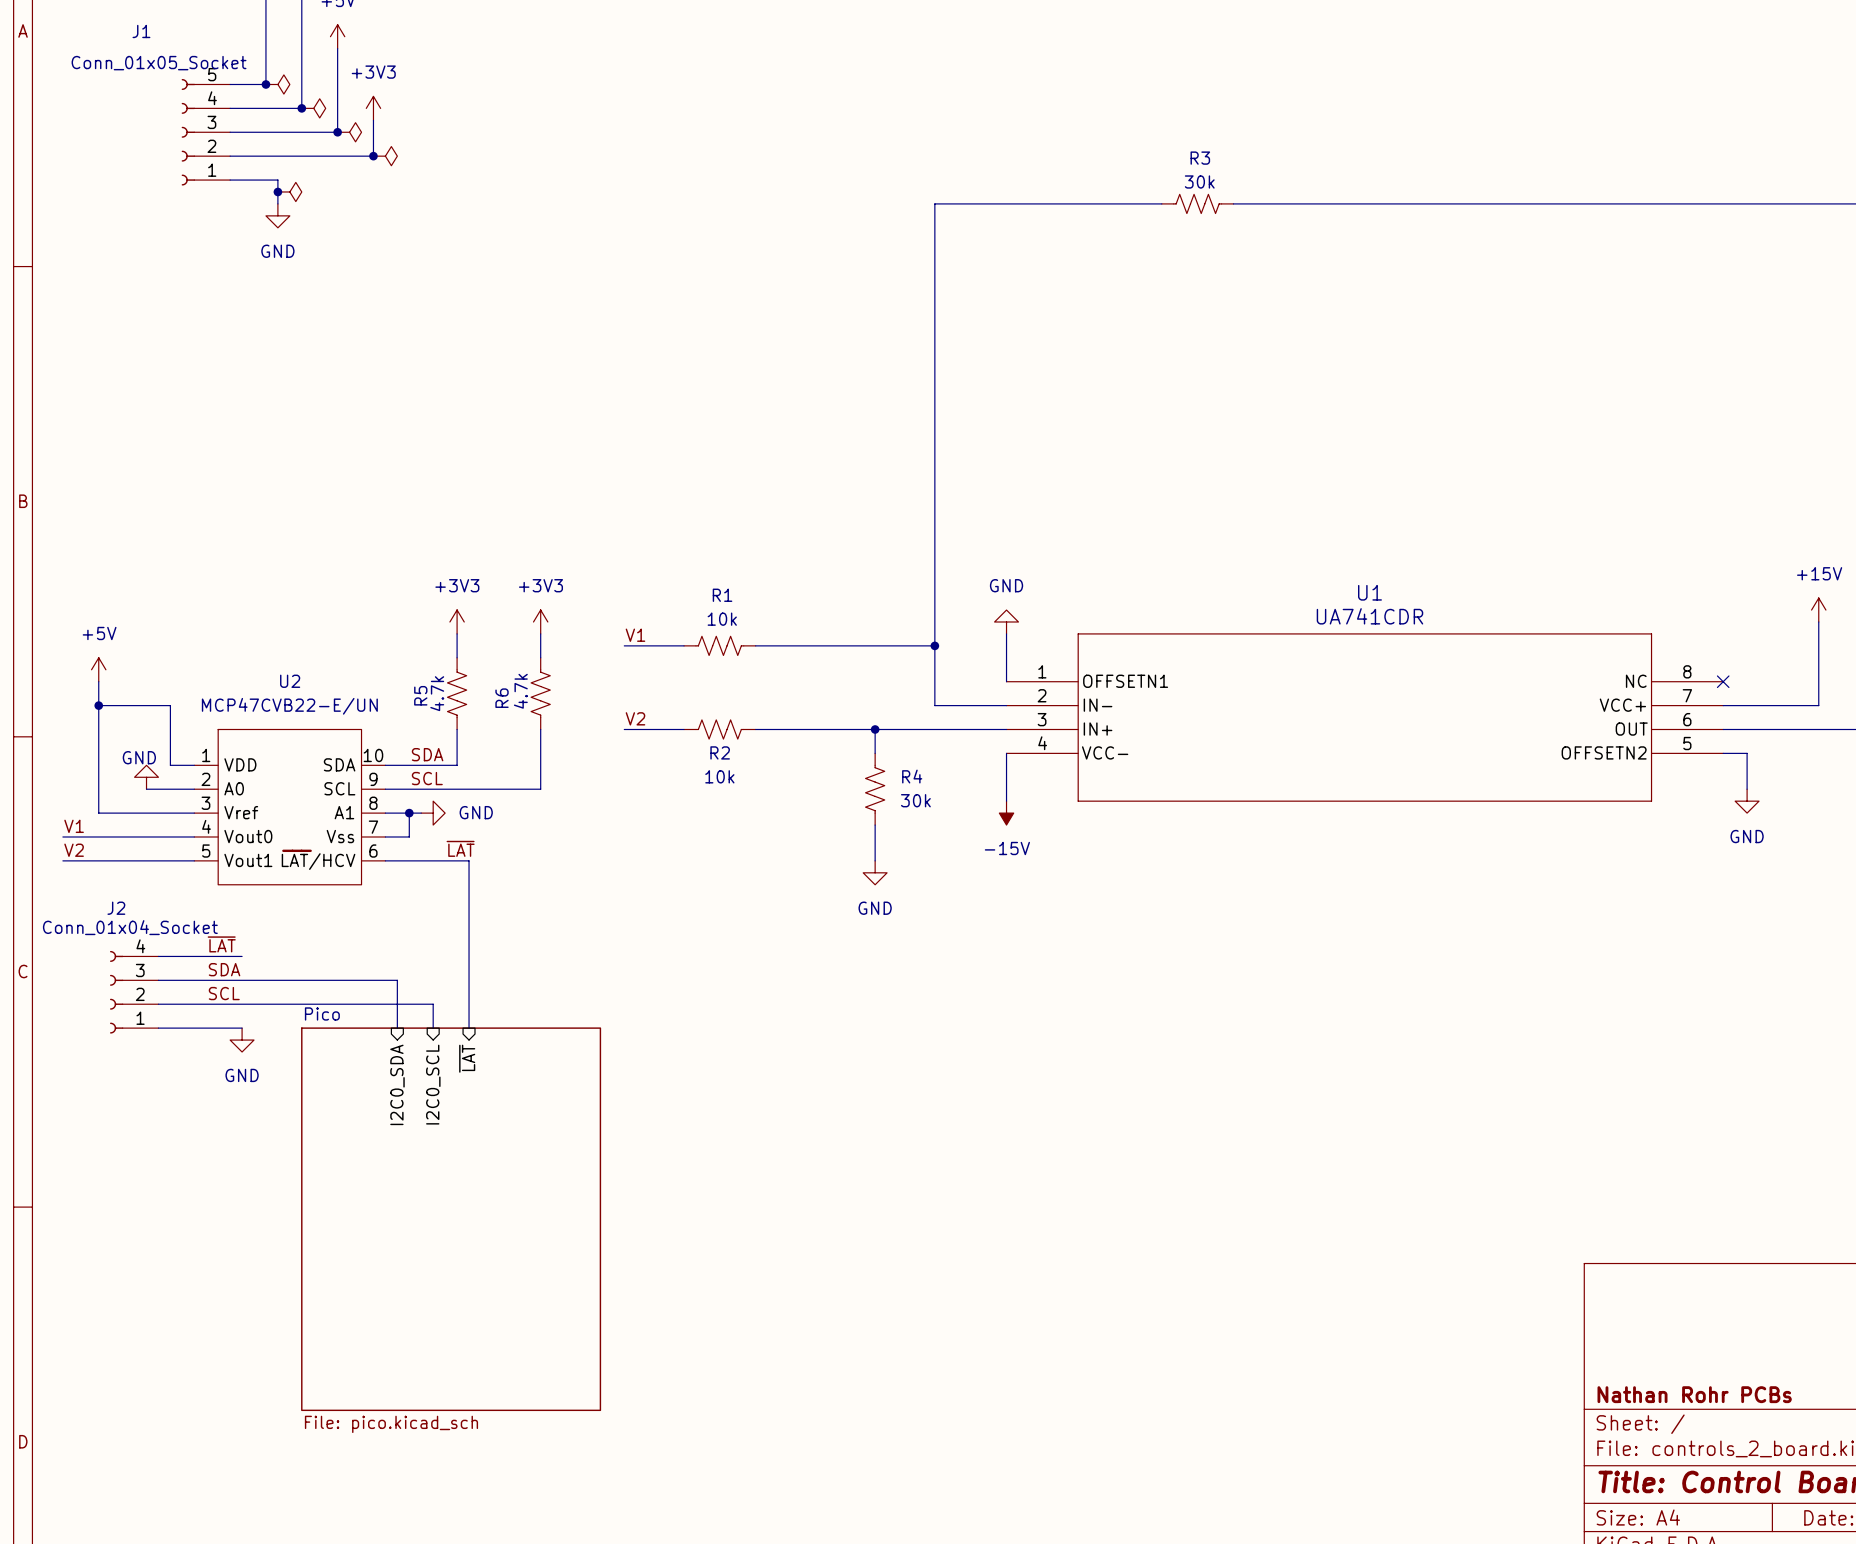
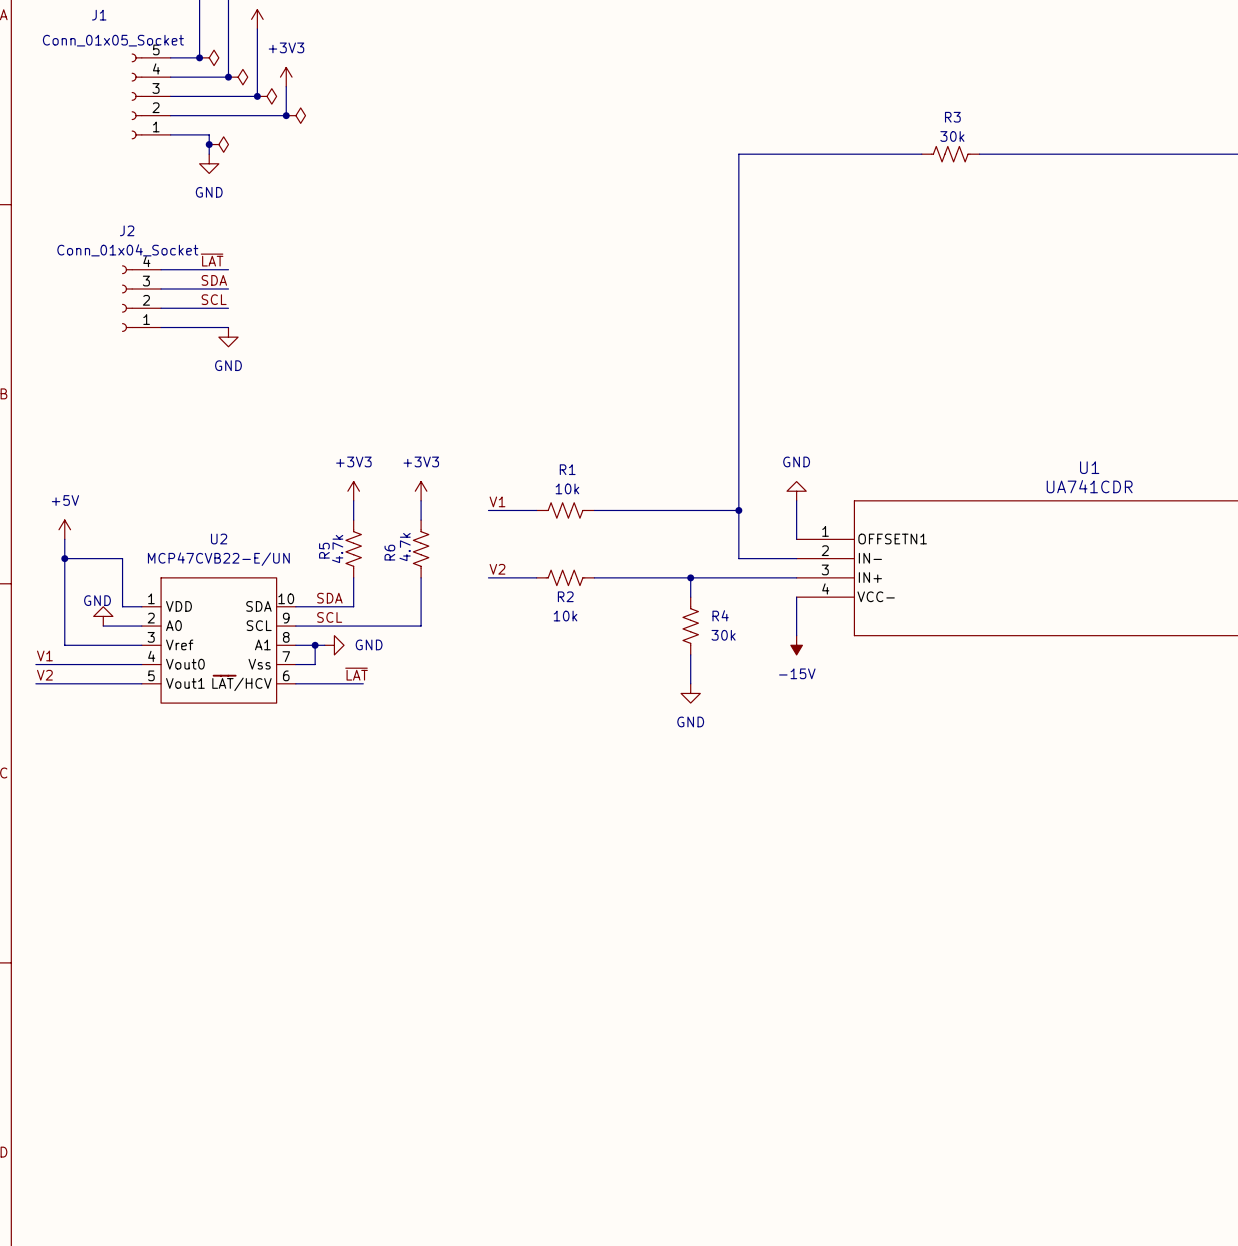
label: none -> ~{LAT} (212, 260)
wire: none -> (161, 269) (228, 269)
label: none -> SDA (214, 280)
wire: none -> (161, 288) (228, 288)
label: none -> SCL (214, 299)
wire: none -> (161, 308) (228, 308)
wire: none -> (161, 327) (228, 327)
power symbol: none -> GND (228, 337)
wire: (469, 860) (469, 1028) -> none
J2 value position: Conn_01x04_Socket (130, 927) -> Conn_01x04_Socket (127, 250)
label: ~{LAT} (221, 944) -> none
wire: (158, 956) (242, 956) -> none
label: SDA (224, 969) -> none
wire: (158, 980) (397, 980) (397, 1028) -> none
J2 position: (134, 992) -> (141, 298)
label: SCL (224, 993) -> none
wire: (158, 1004) (433, 1004) (433, 1028) -> none
wire: (158, 1028) (242, 1028) -> none
power symbol: GND (242, 1040) -> none
sheet pin: ~{LAT} (467, 1058) -> none
sheet pin: I2C0_SDA (397, 1084) -> none
sheet pin: I2C0_SCL (433, 1084) -> none
sheet Pico: File: pico.kicad_sch (451, 1219) -> none

